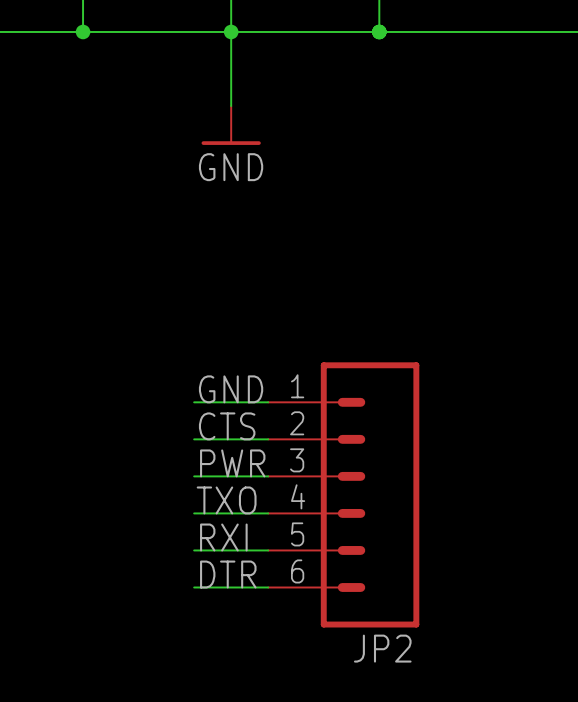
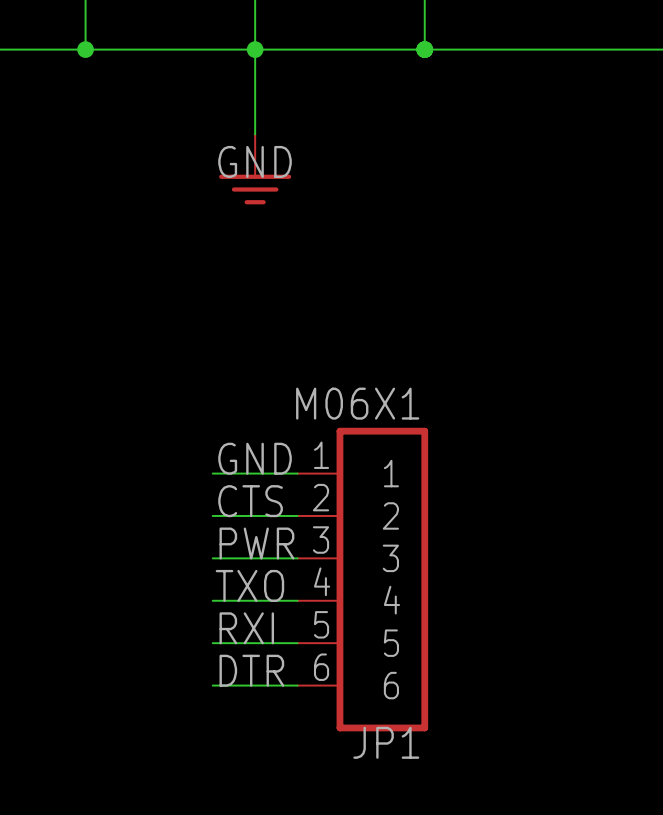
power symbol shape: [201, 106, 261, 145] -> [219, 134, 292, 205]
power symbol text position: GND (231, 167) -> GND (255, 161)
JP1: none -> M06X1 (362, 579)
JP2: (343, 494) -> none

